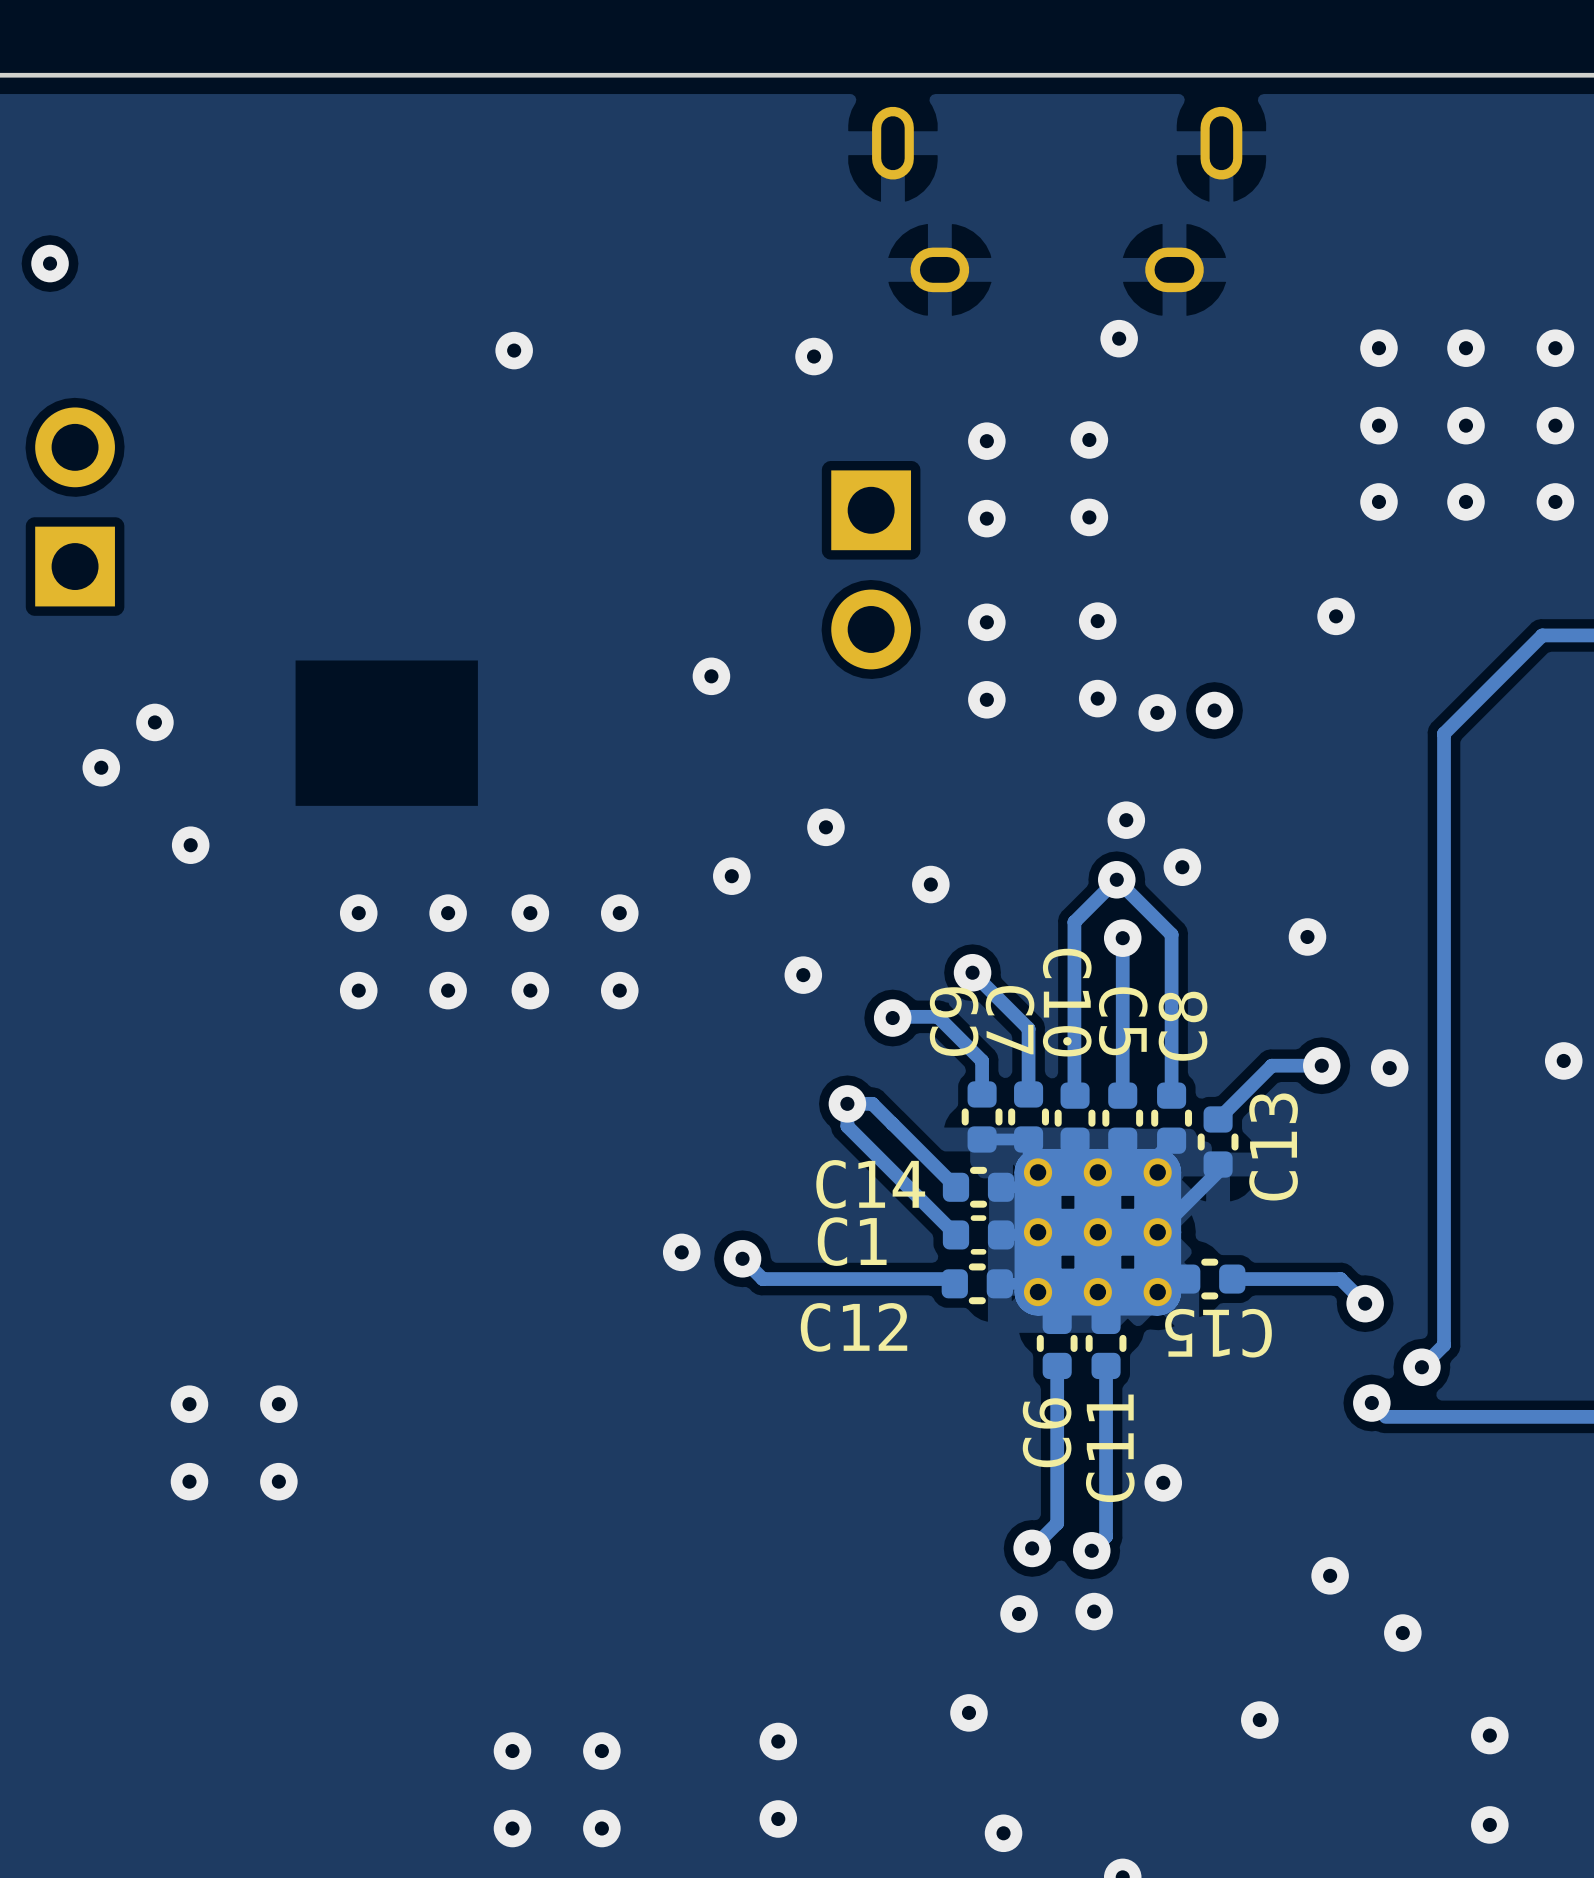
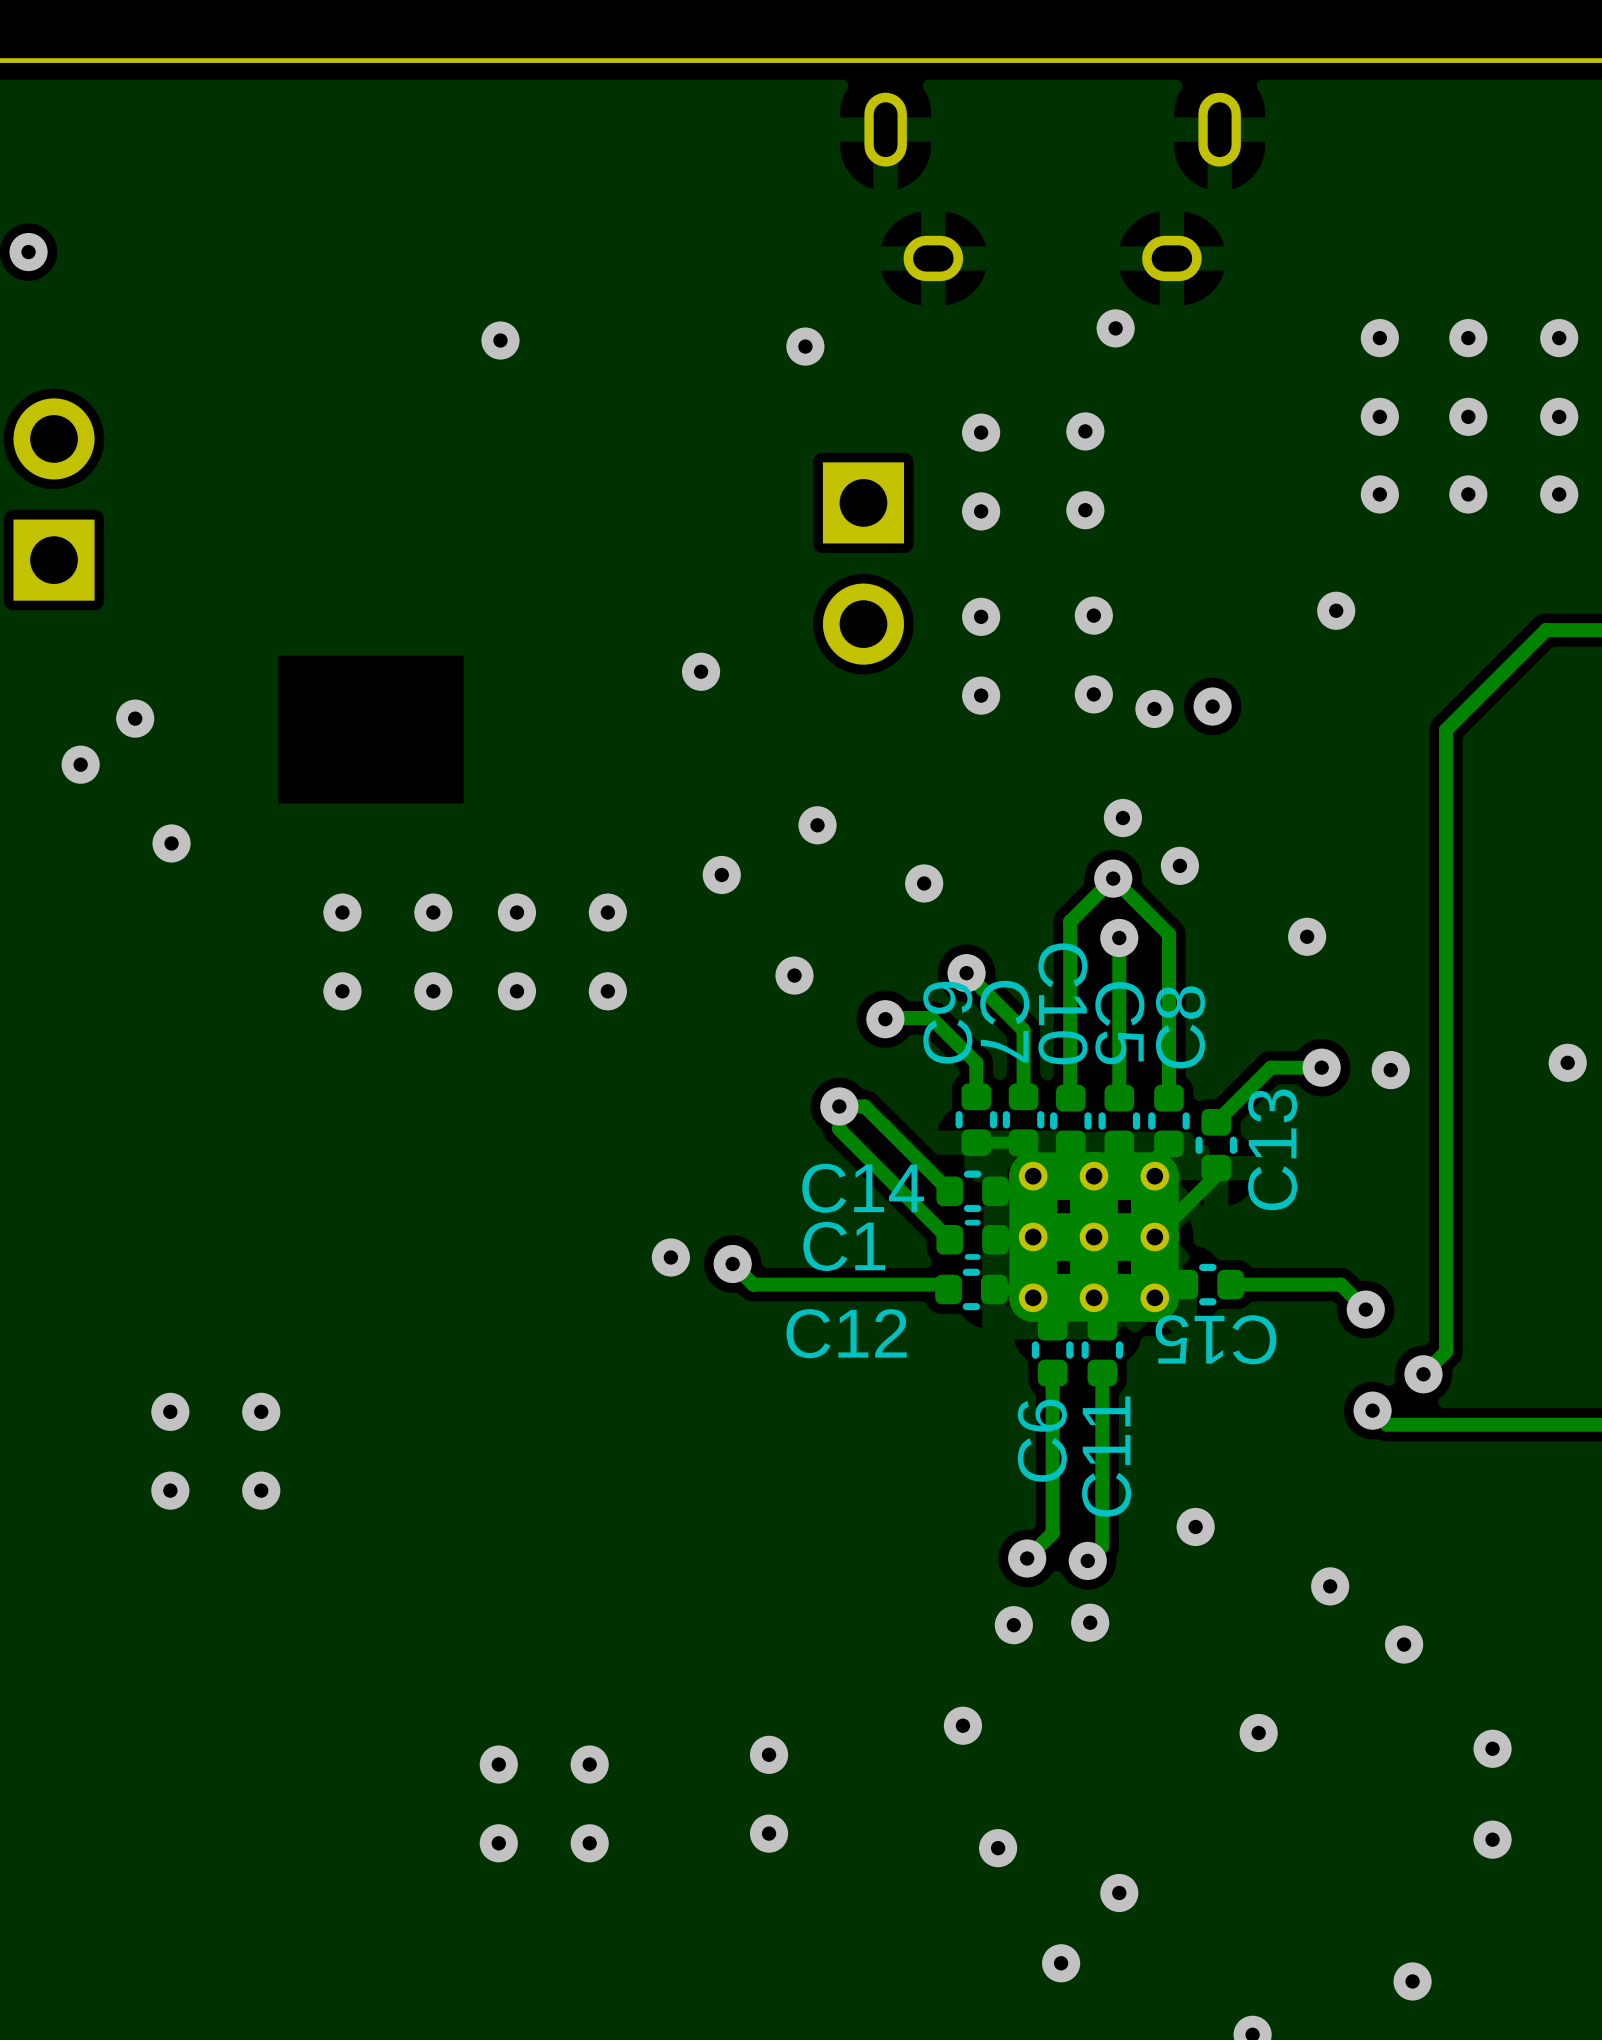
via position: (1163, 1482) -> (1195, 1526)

